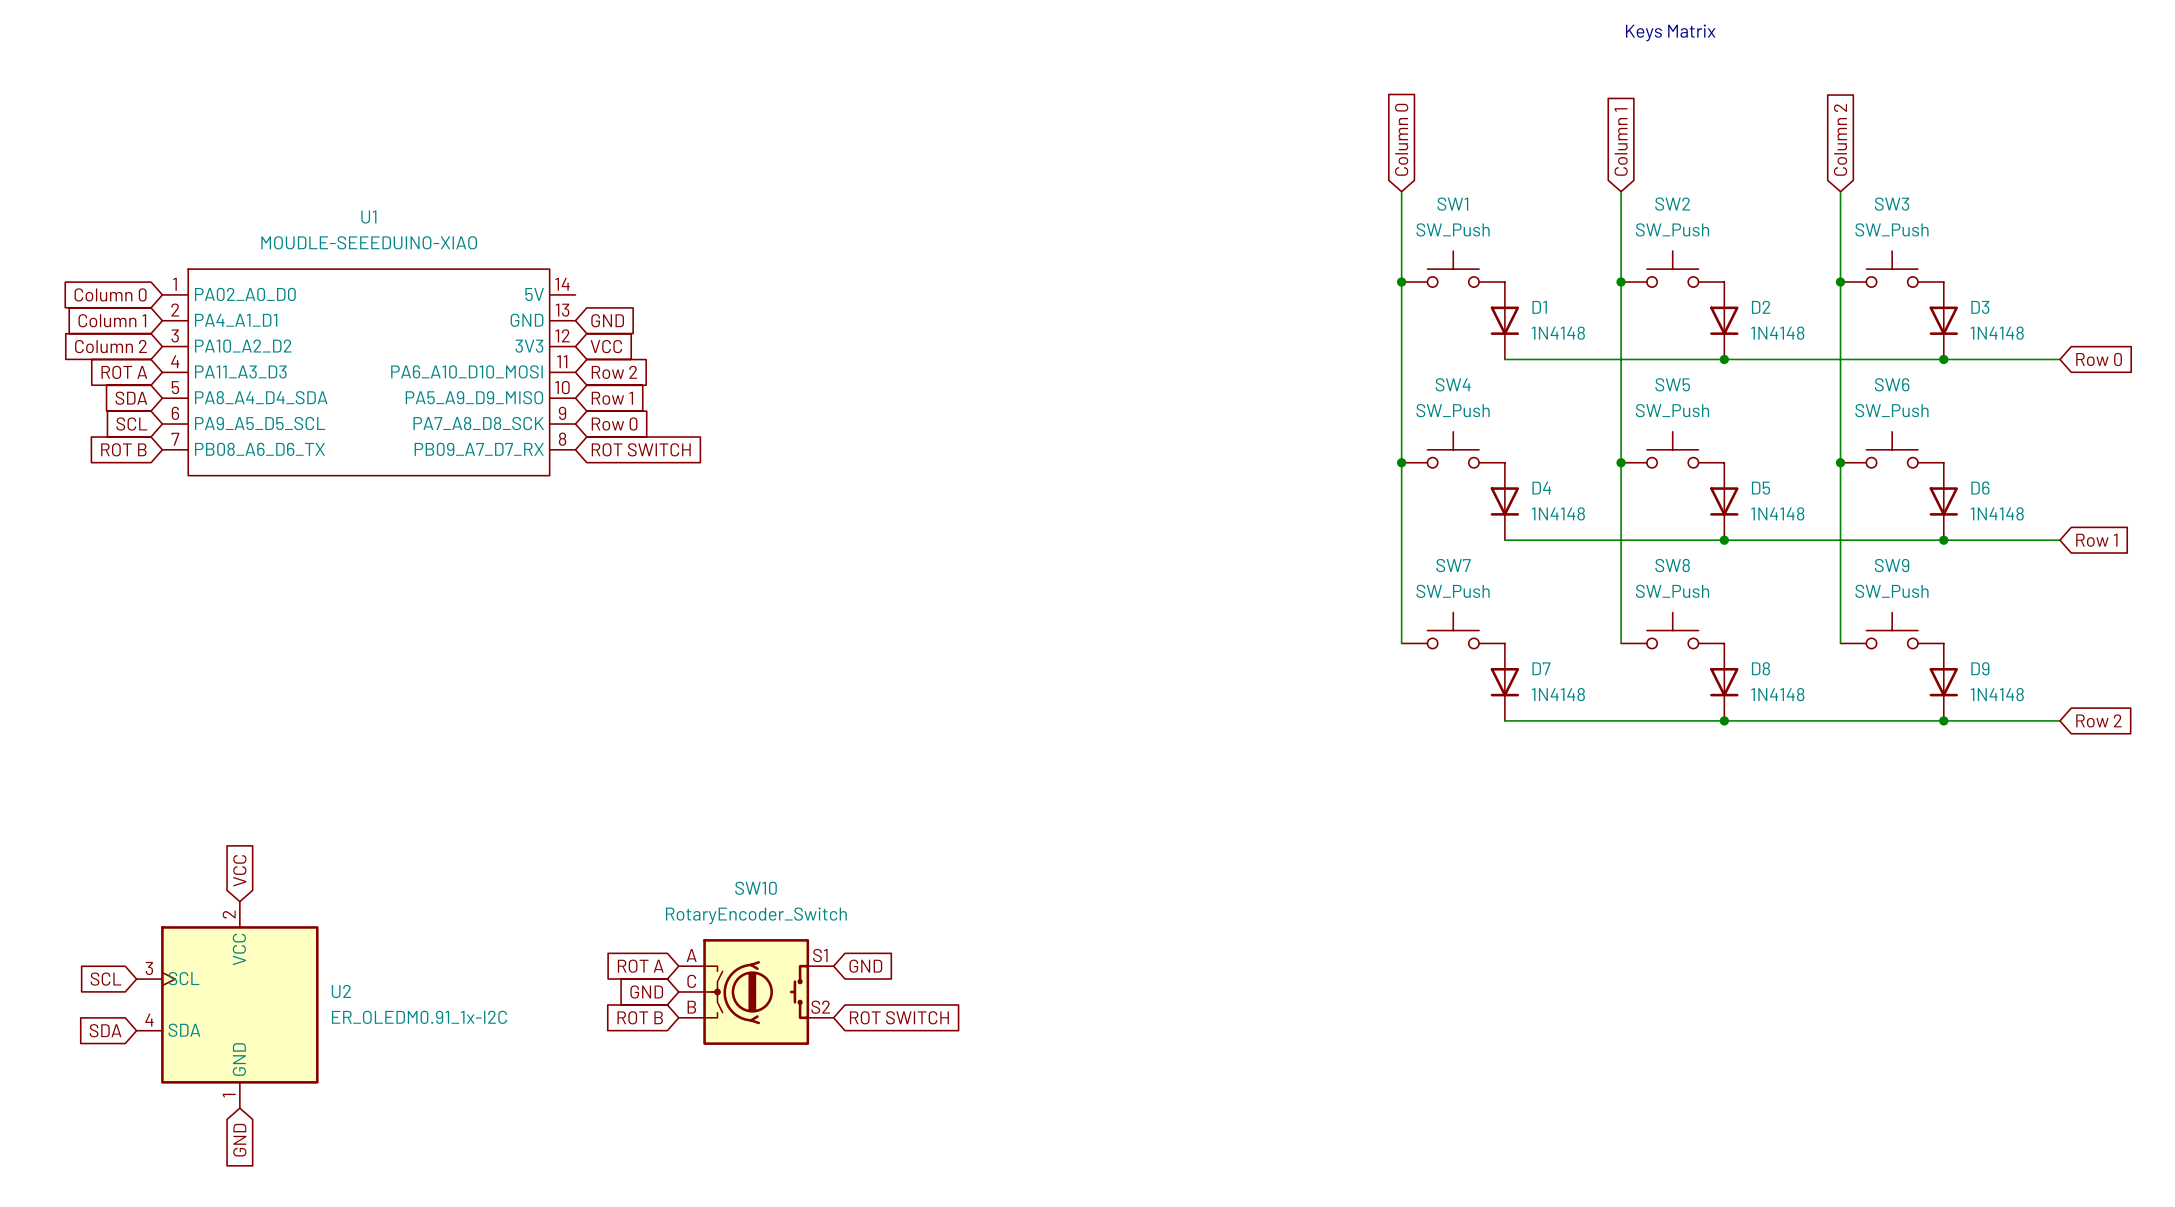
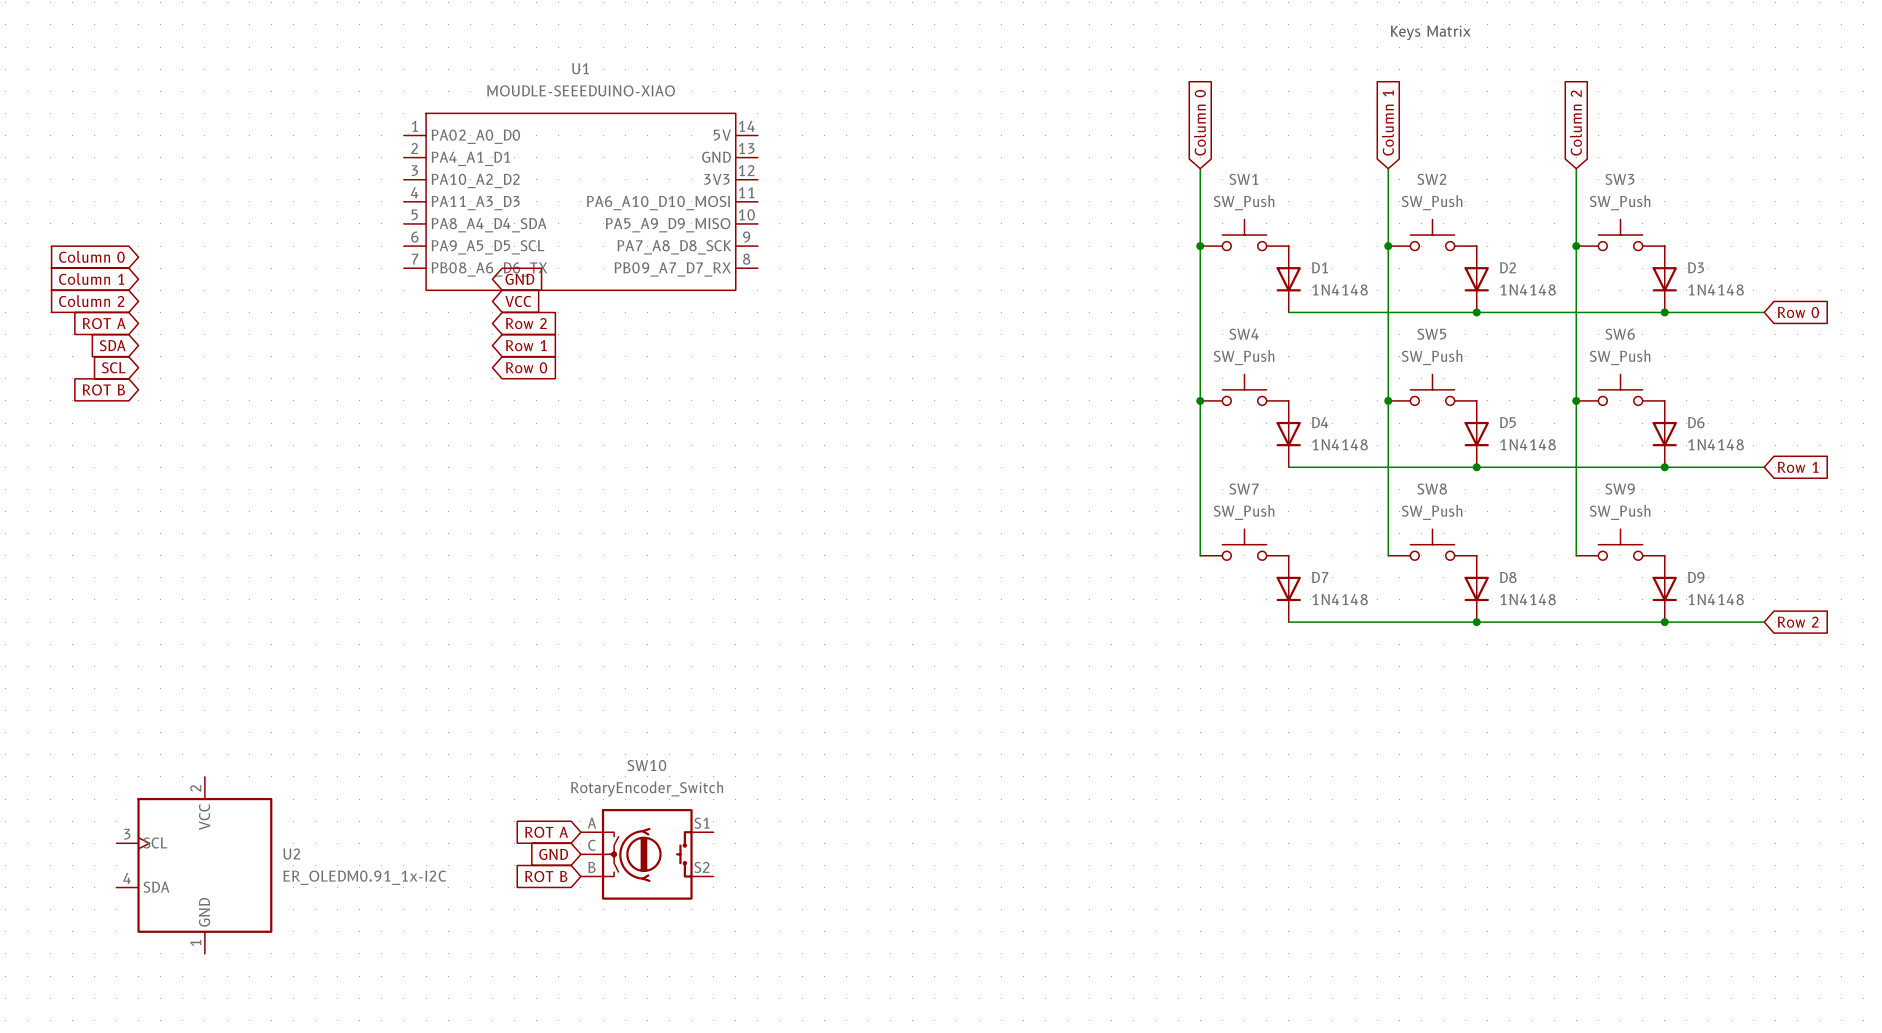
U1 position: (368, 372) -> (580, 201)
global label: ROT SWITCH (641, 449) -> none
global label: VCC (239, 870) -> none
global label: GND (865, 966) -> none
global label: SCL (105, 979) -> none
global label: ROT SWITCH (899, 1017) -> none
global label: SDA (105, 1030) -> none
global label: GND (239, 1140) -> none

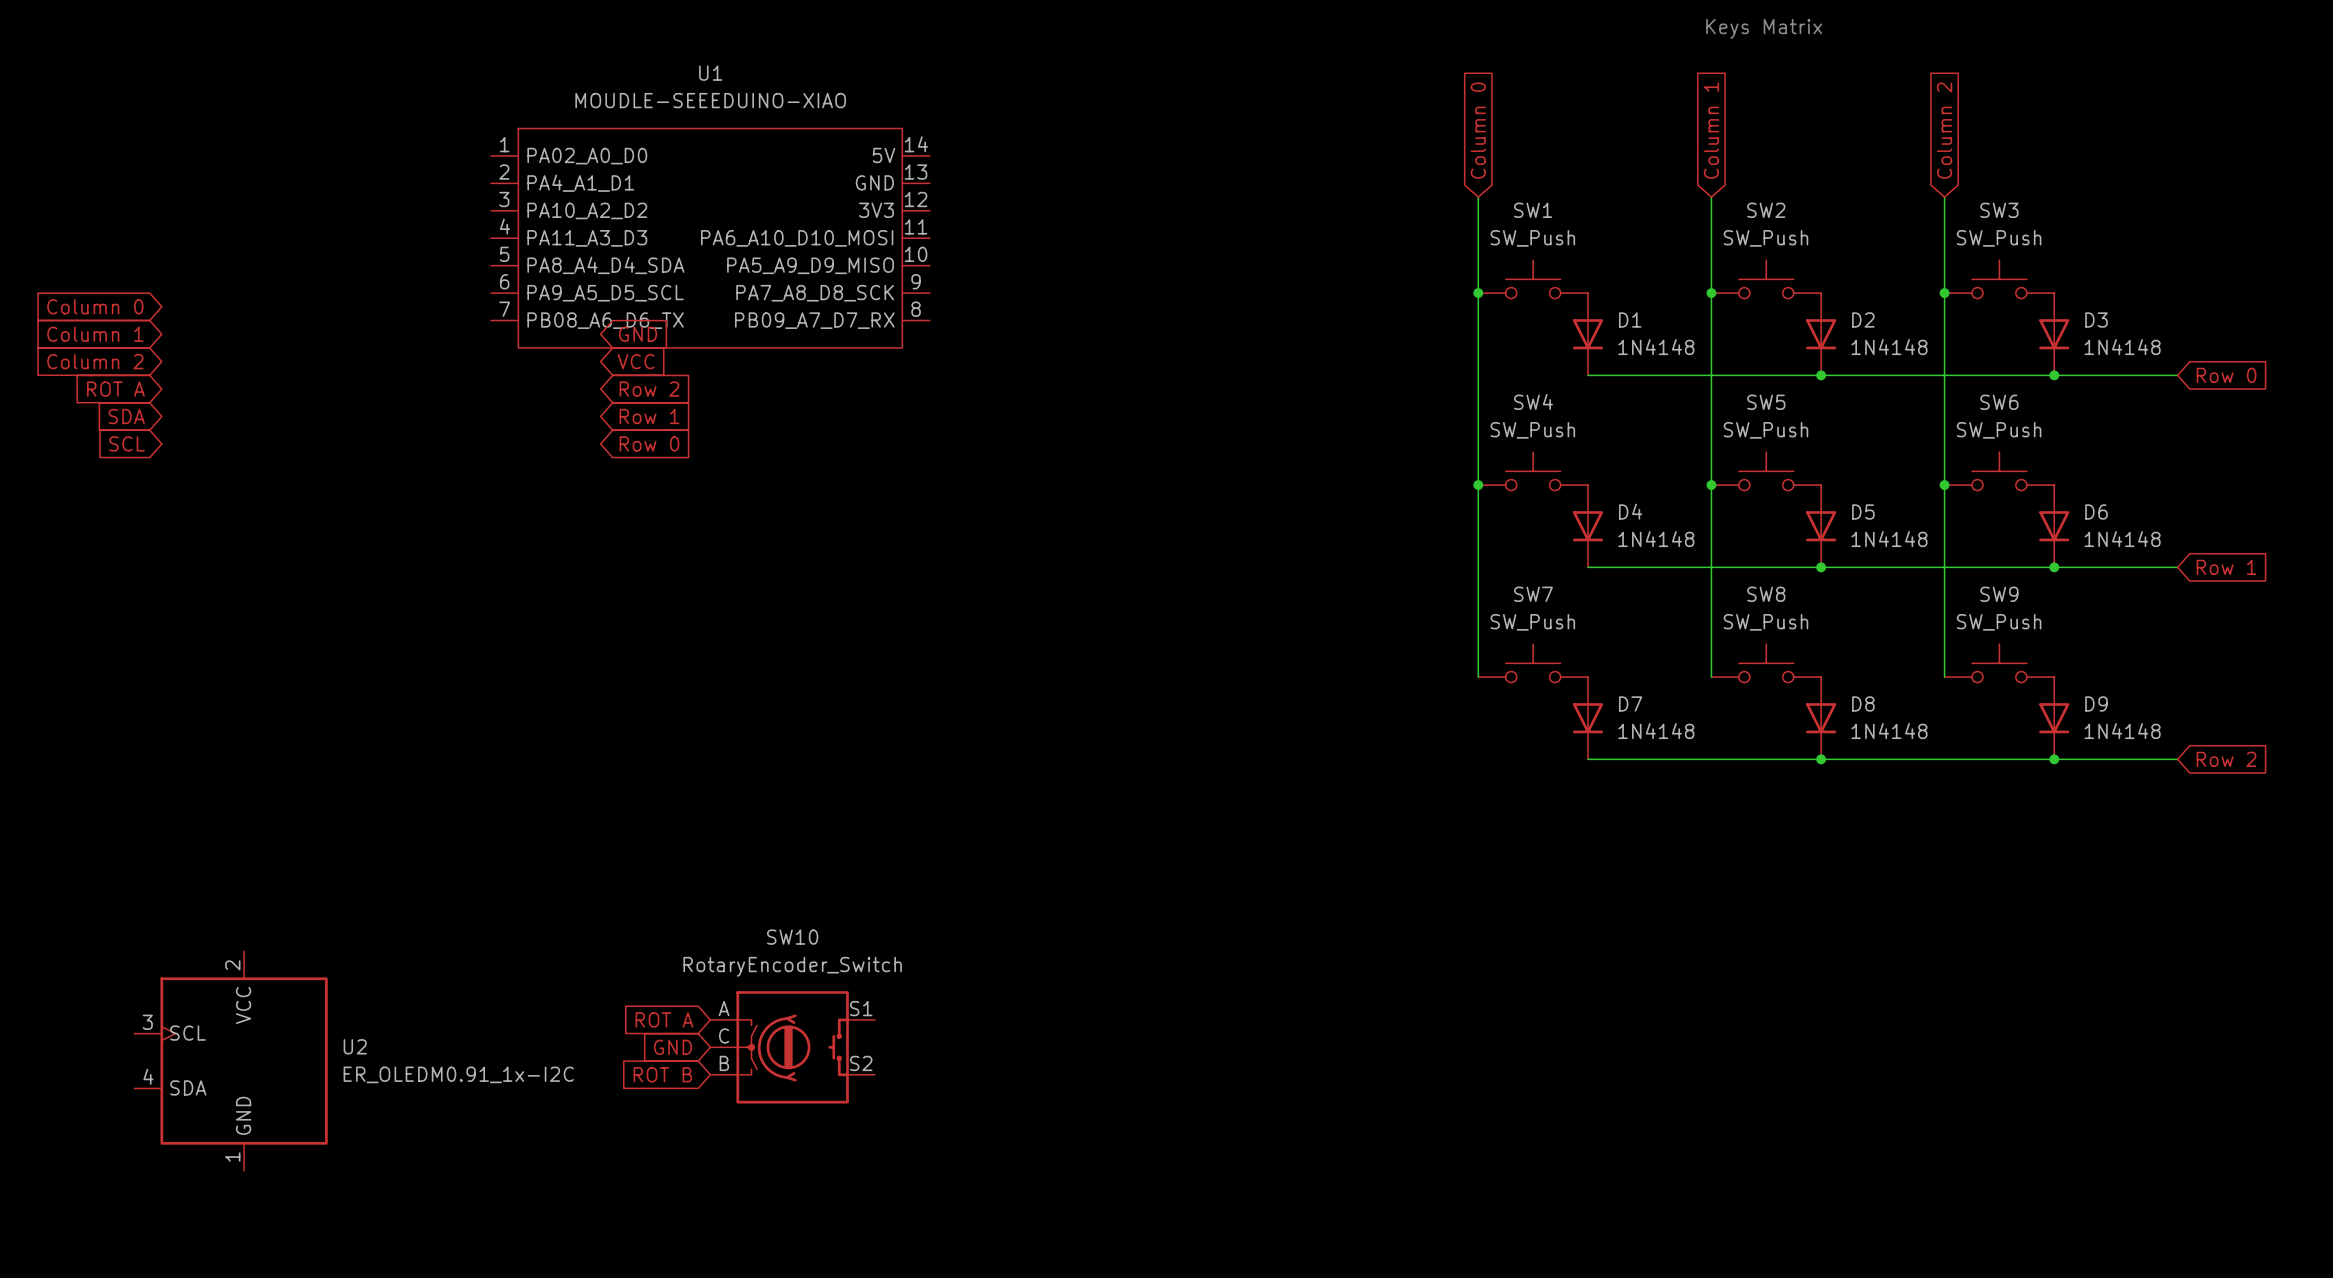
global label: ROT B (103, 389) -> none

